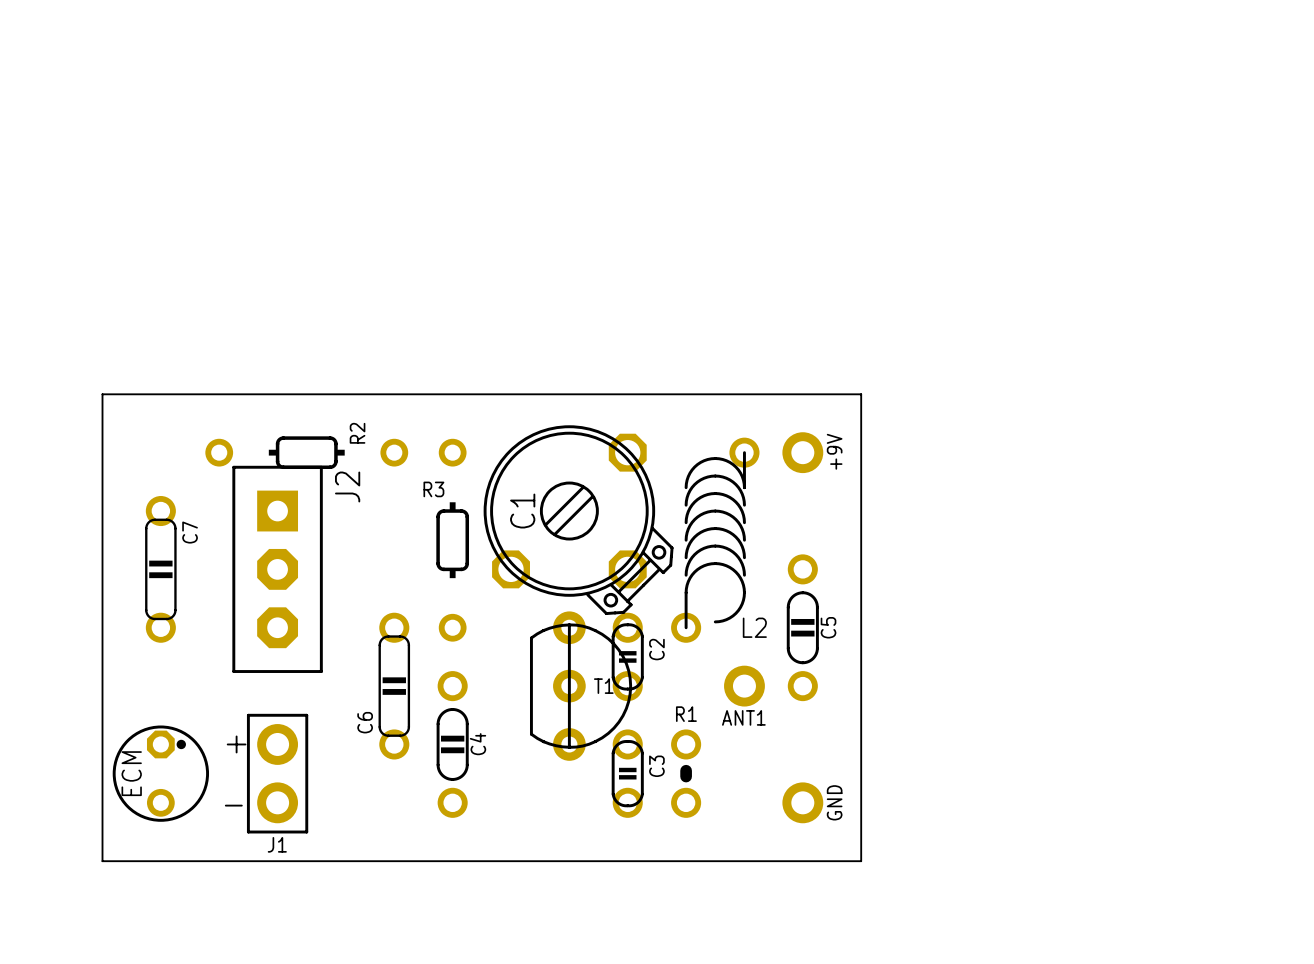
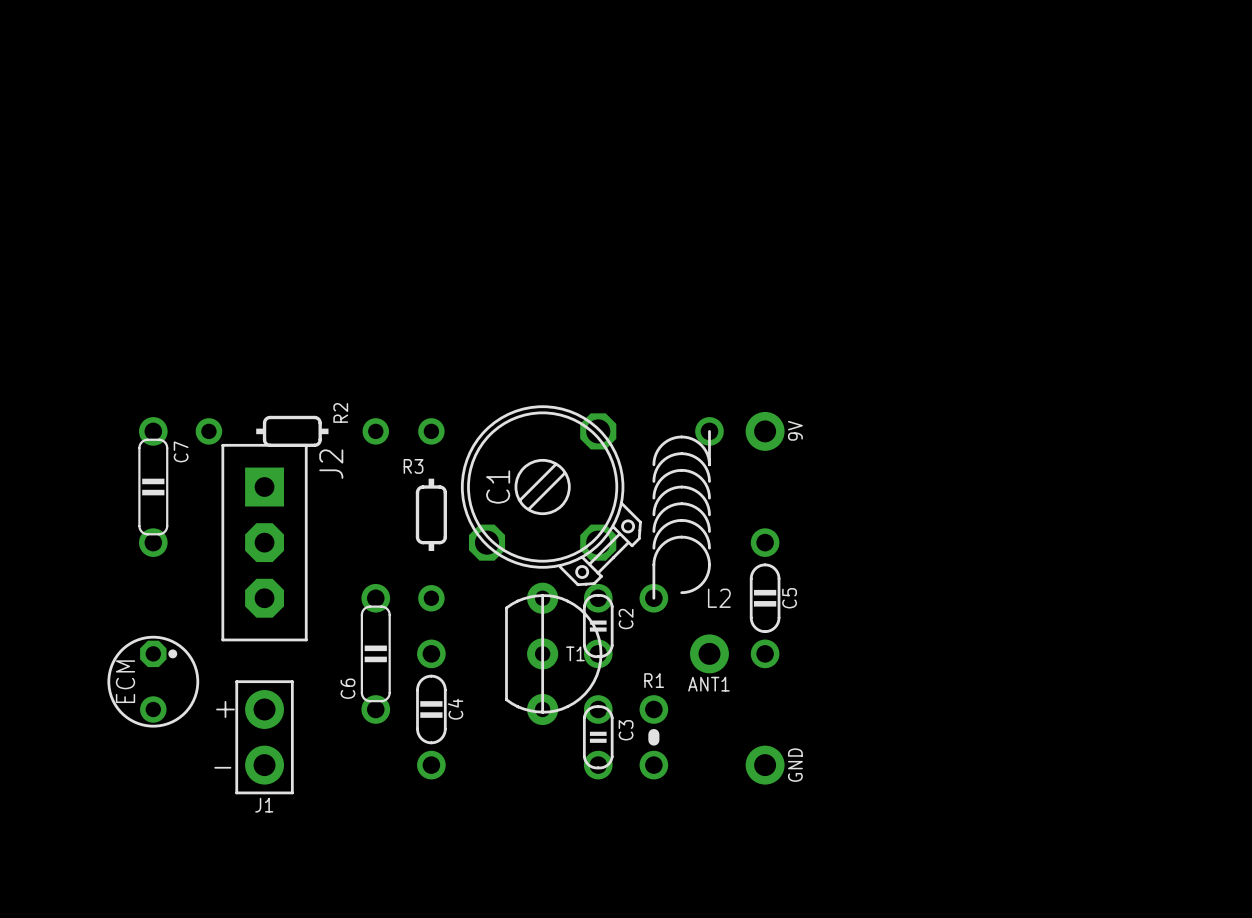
board edge: (102, 394) (102, 861) (861, 861) (861, 394) (102, 394) -> none
+9V name: +9V (834, 451) -> 9V (795, 430)
C7 position: (160, 569) -> (153, 487)
ECM position: (160, 773) -> (153, 681)

